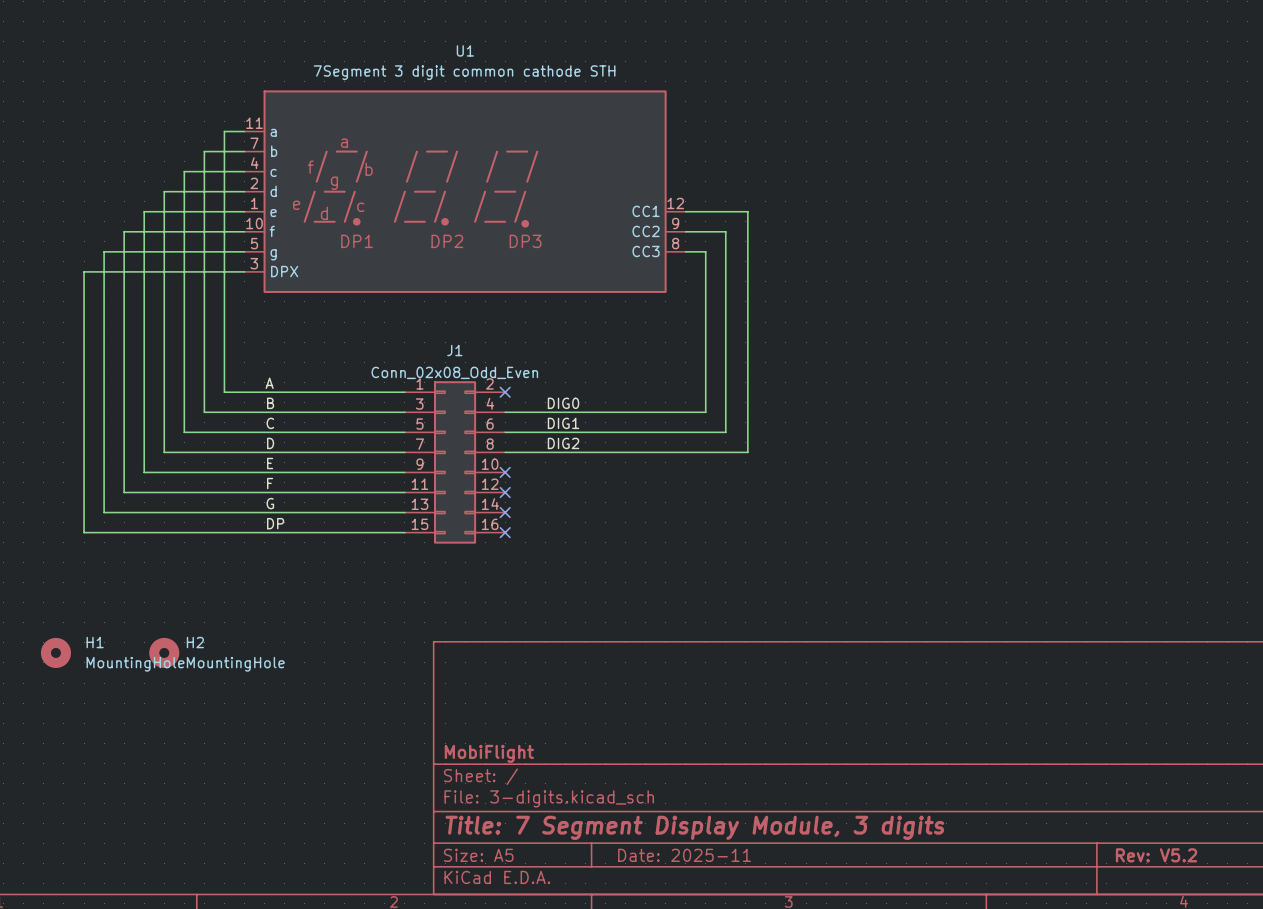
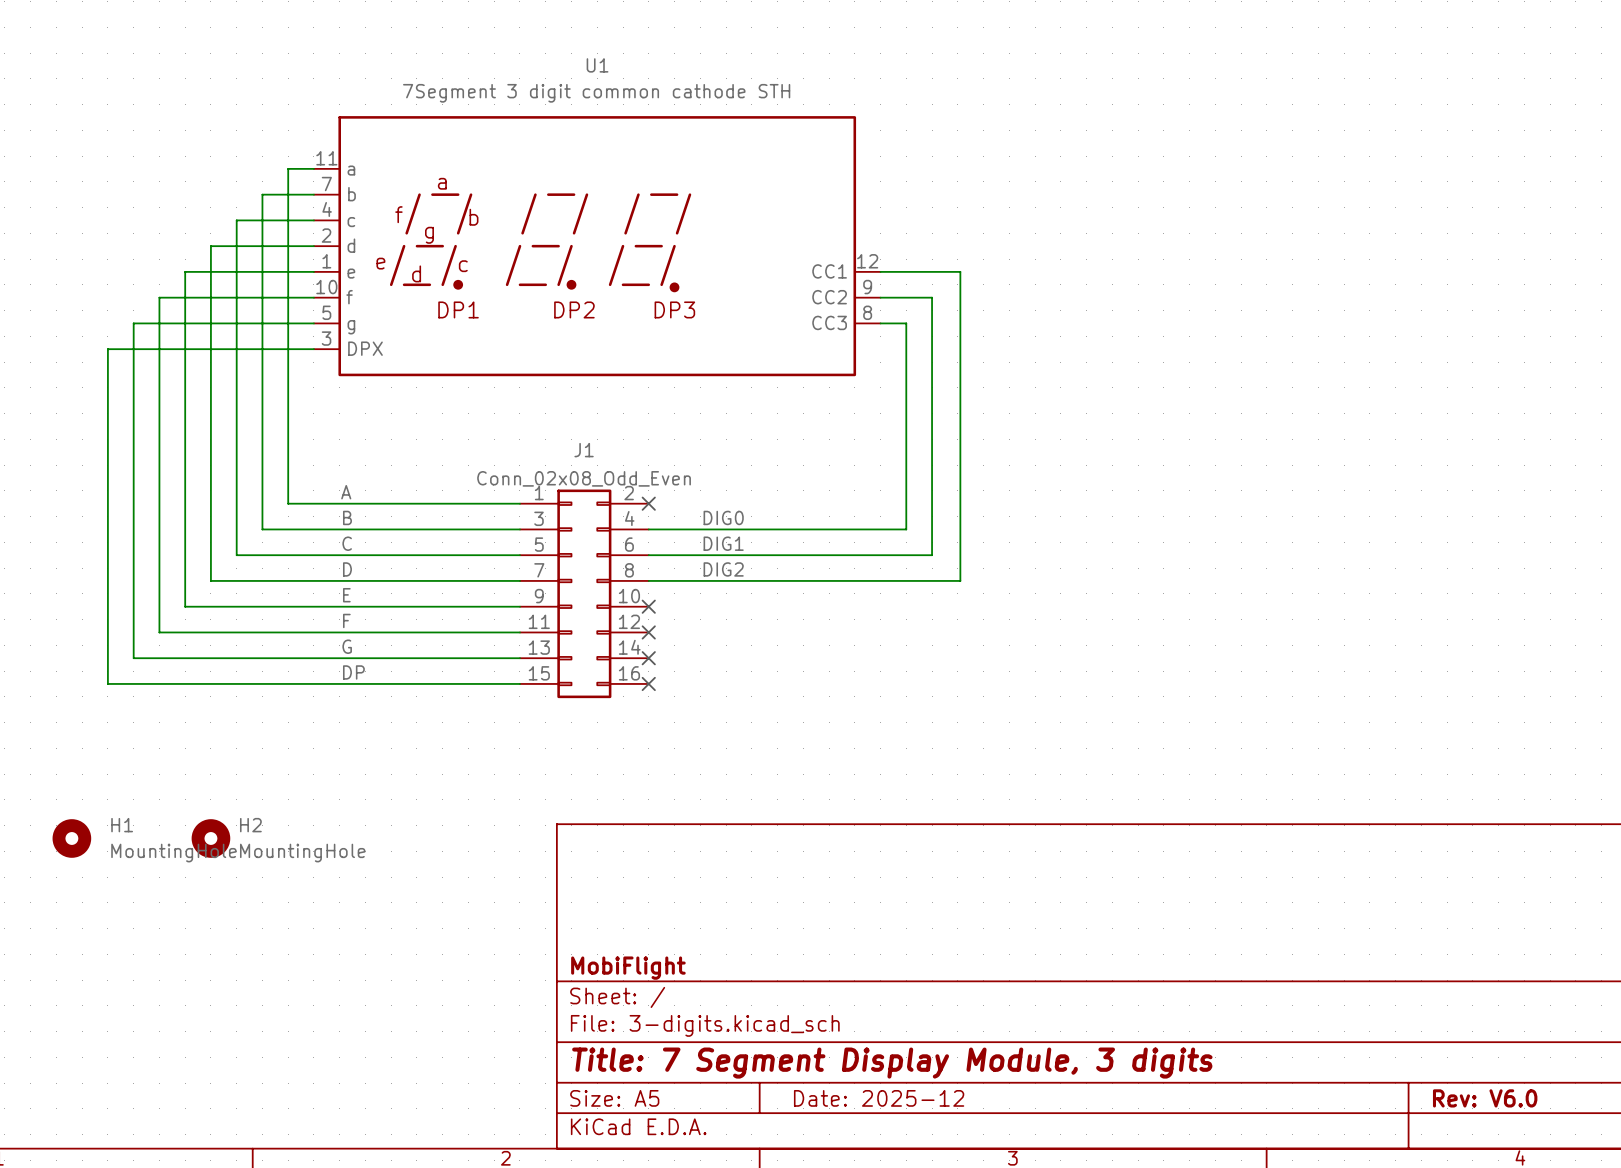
title block: Date: 2025-11 (684, 855) -> Date: 2025-12 (879, 1098)
title block: Rev: V5.2 (1156, 855) -> Rev: V6.0 (1485, 1098)

